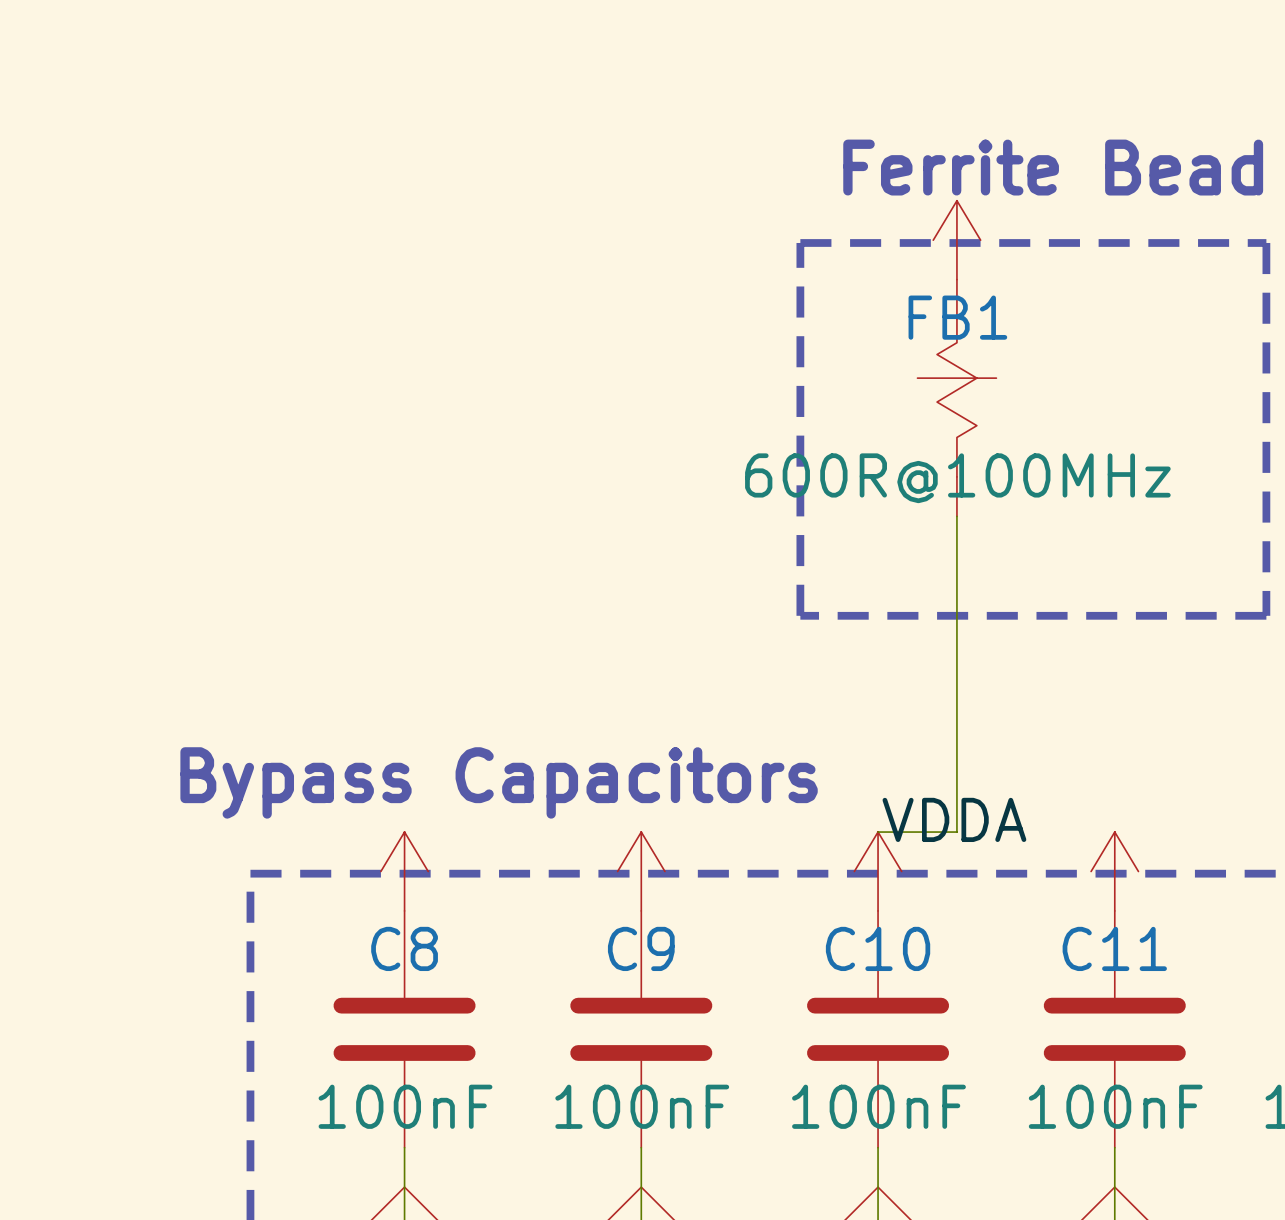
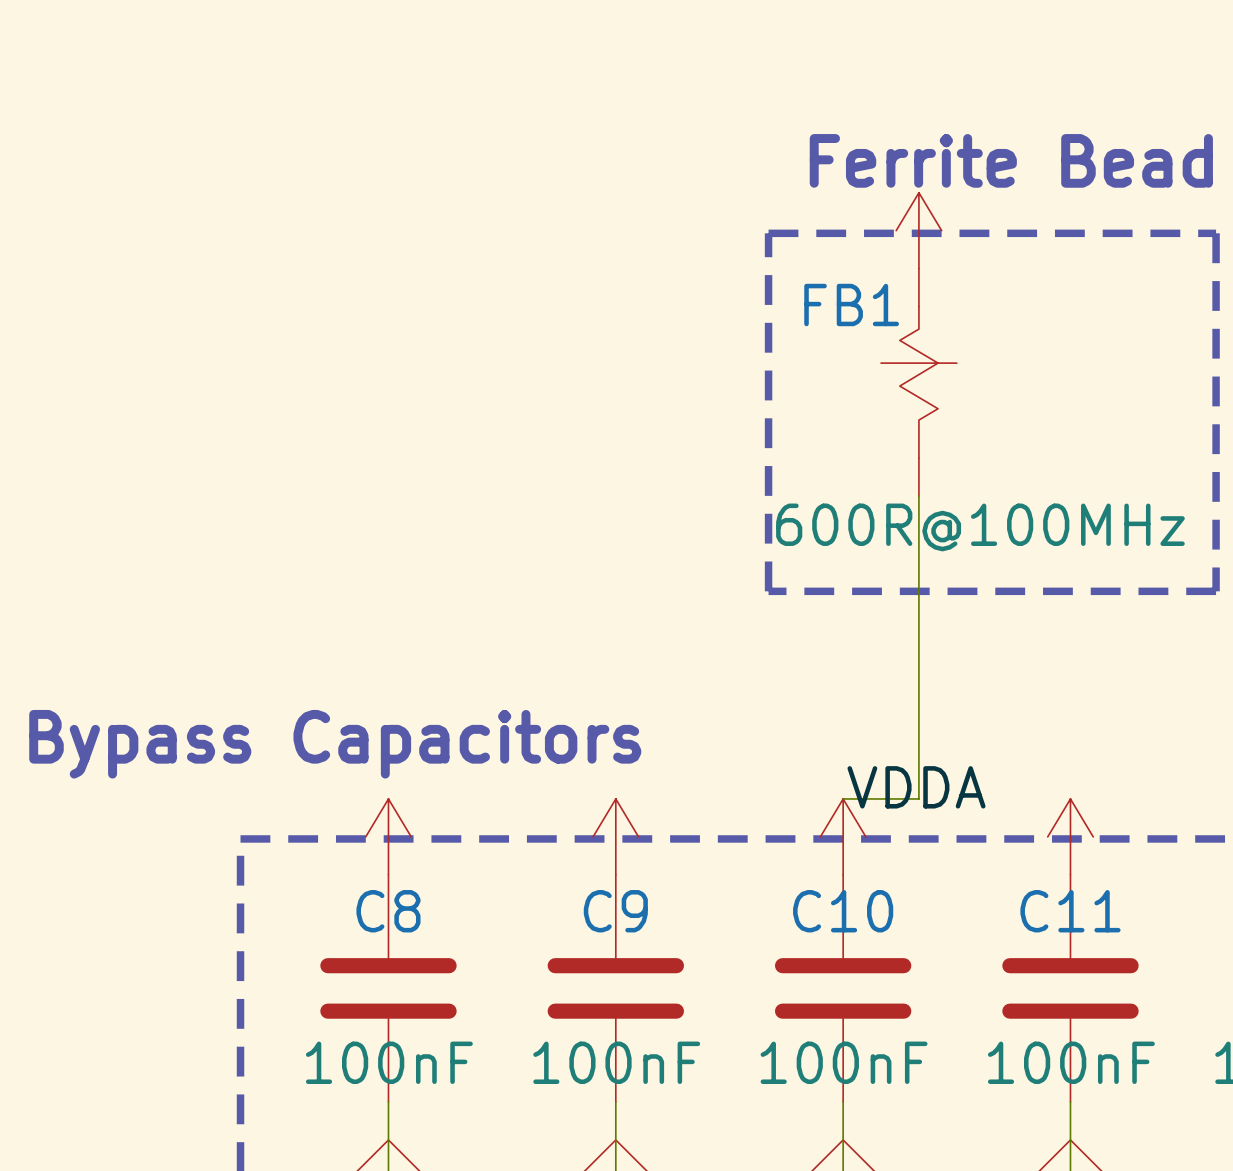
FB1 name position: FB1 (957, 317) -> FB1 (851, 305)
FB1 value position: 600R@100MHz (957, 478) -> 600R@100MHz (980, 527)
text position: Bypass Capacitors (499, 782) -> Bypass Capacitors (335, 744)

